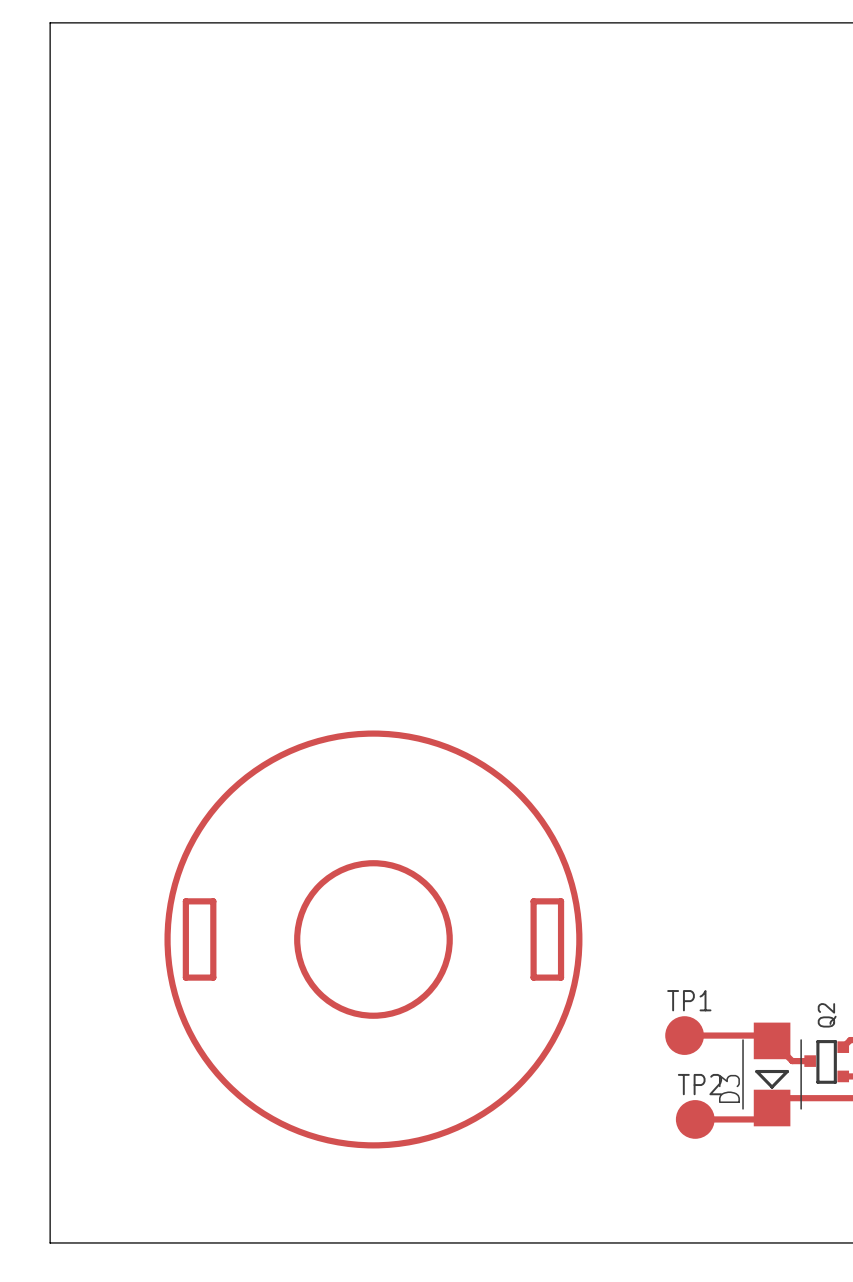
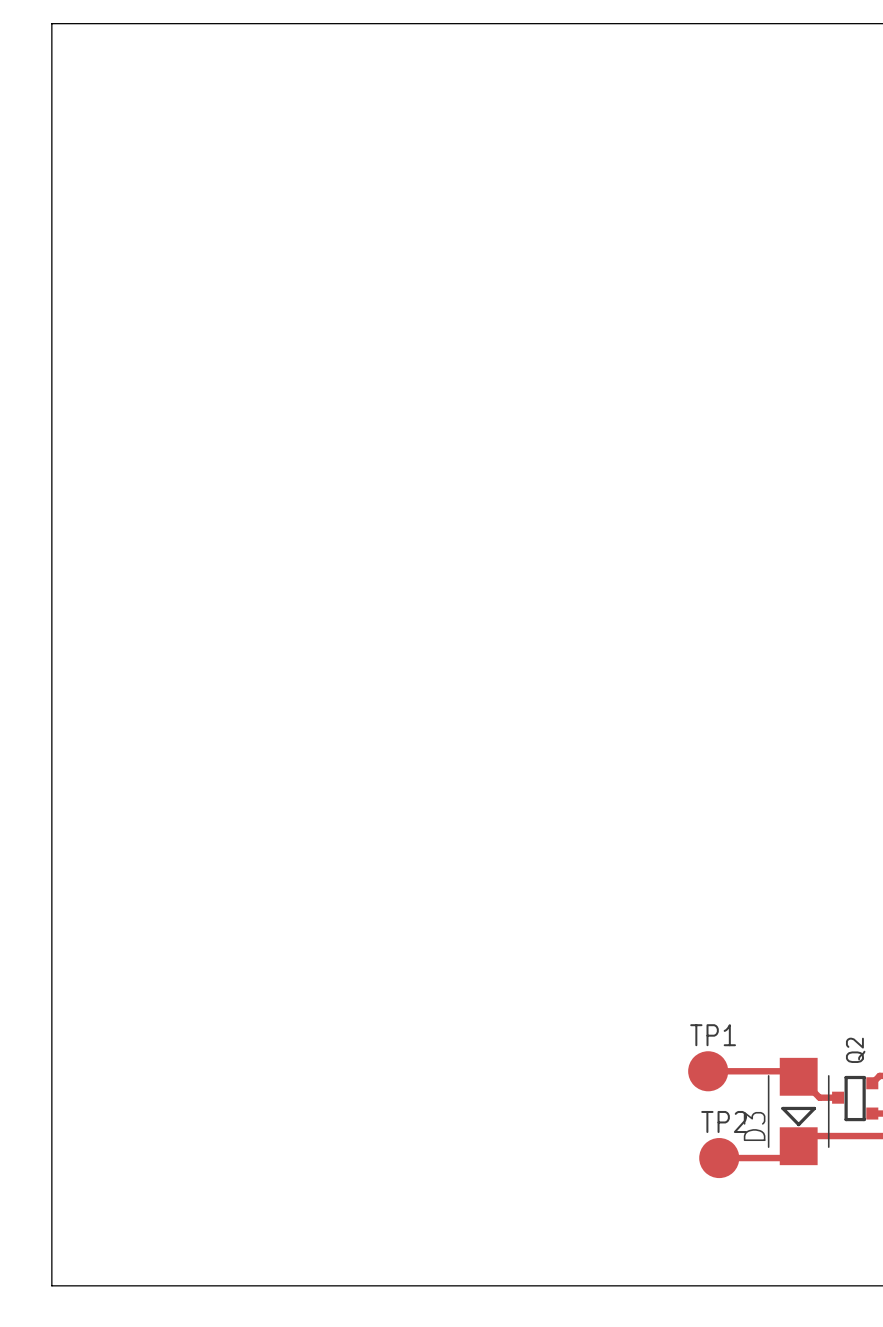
drawing: [164, 730, 583, 1149] -> none
track: (185, 901) (213, 901) (213, 977) (185, 977) (185, 901) -> none
track: (533, 901) (561, 901) (561, 977) (533, 977) (533, 901) -> none

